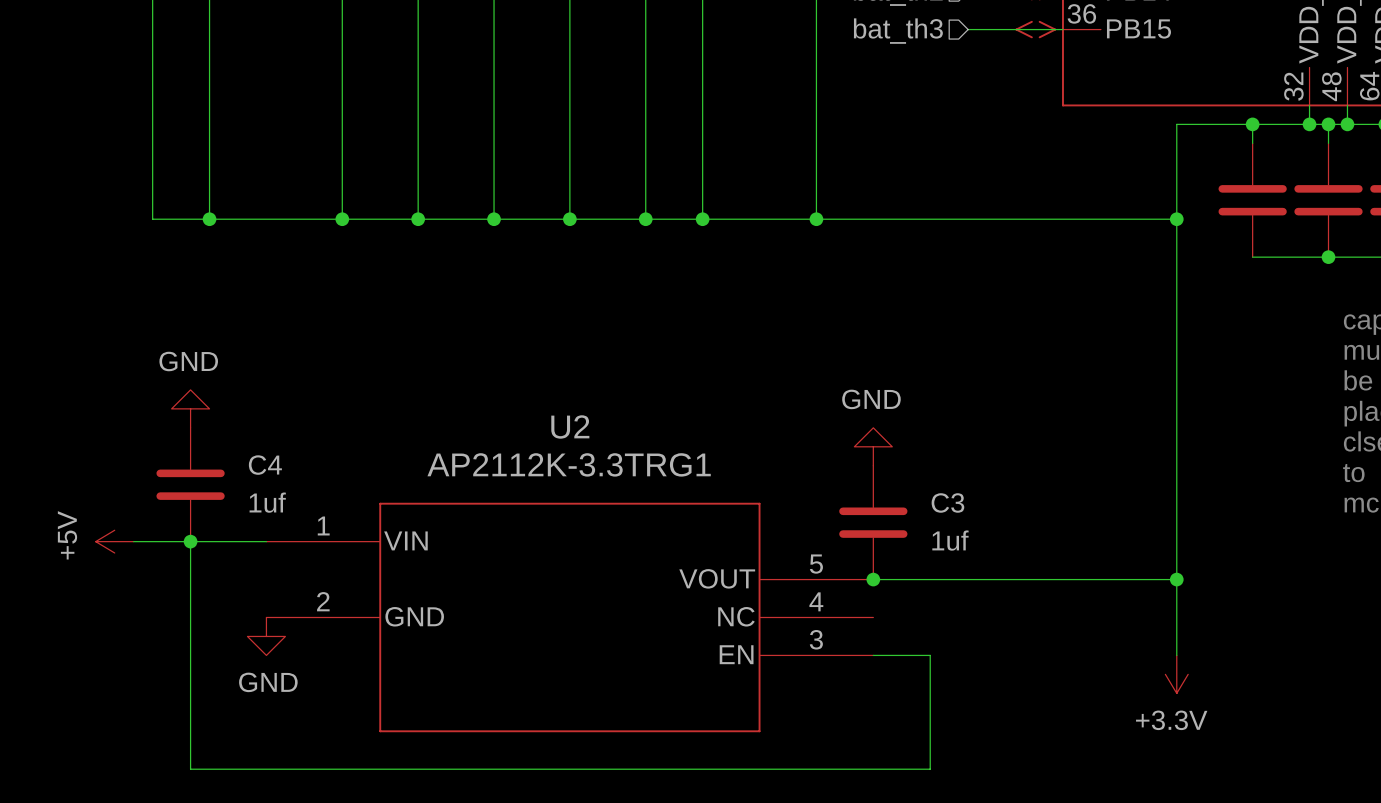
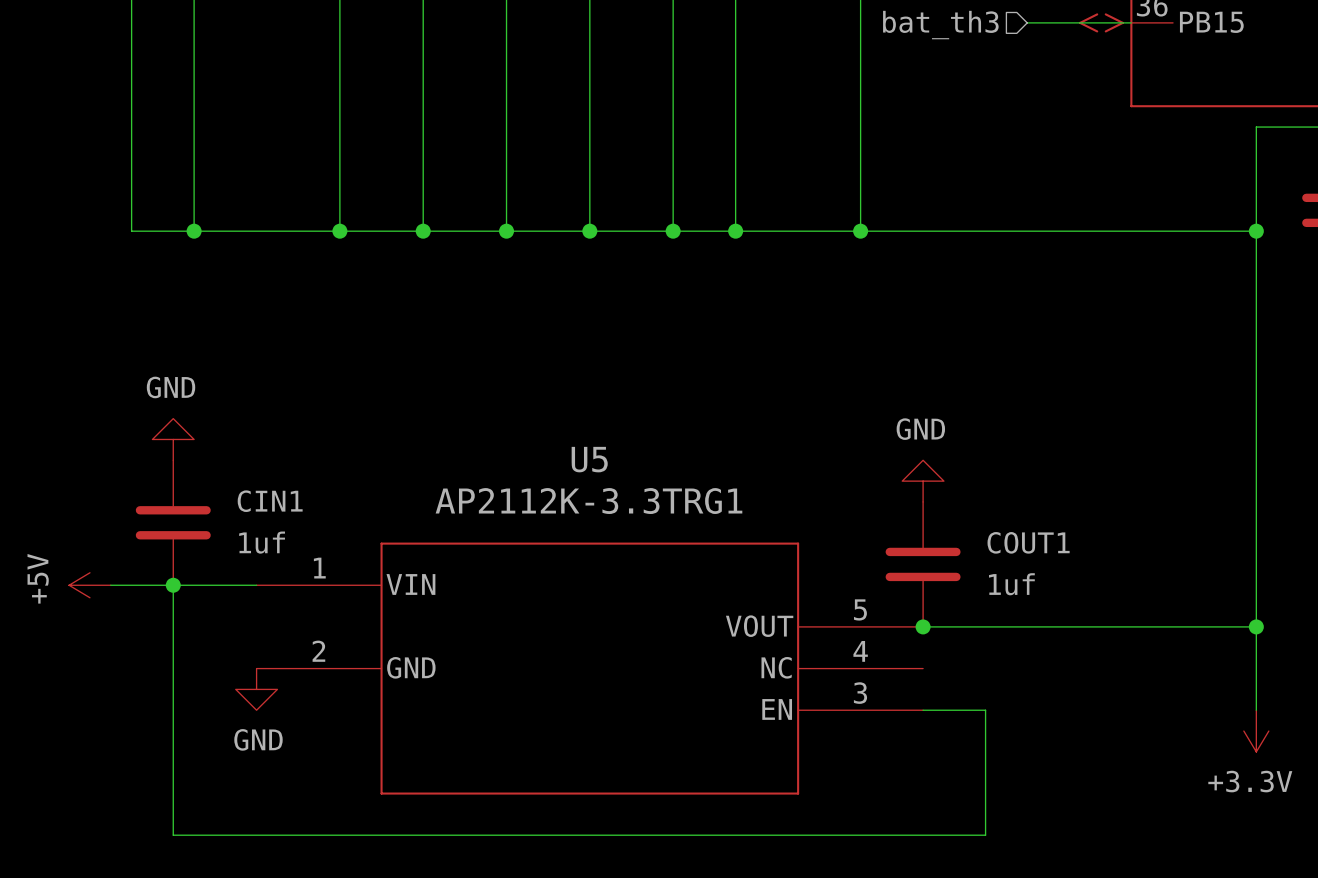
U2 name: U2 (570, 426) -> U5 (589, 459)
C4 name: C4 (265, 465) -> CIN1 (270, 501)
C3 name: C3 (947, 502) -> COUT1 (1028, 542)

